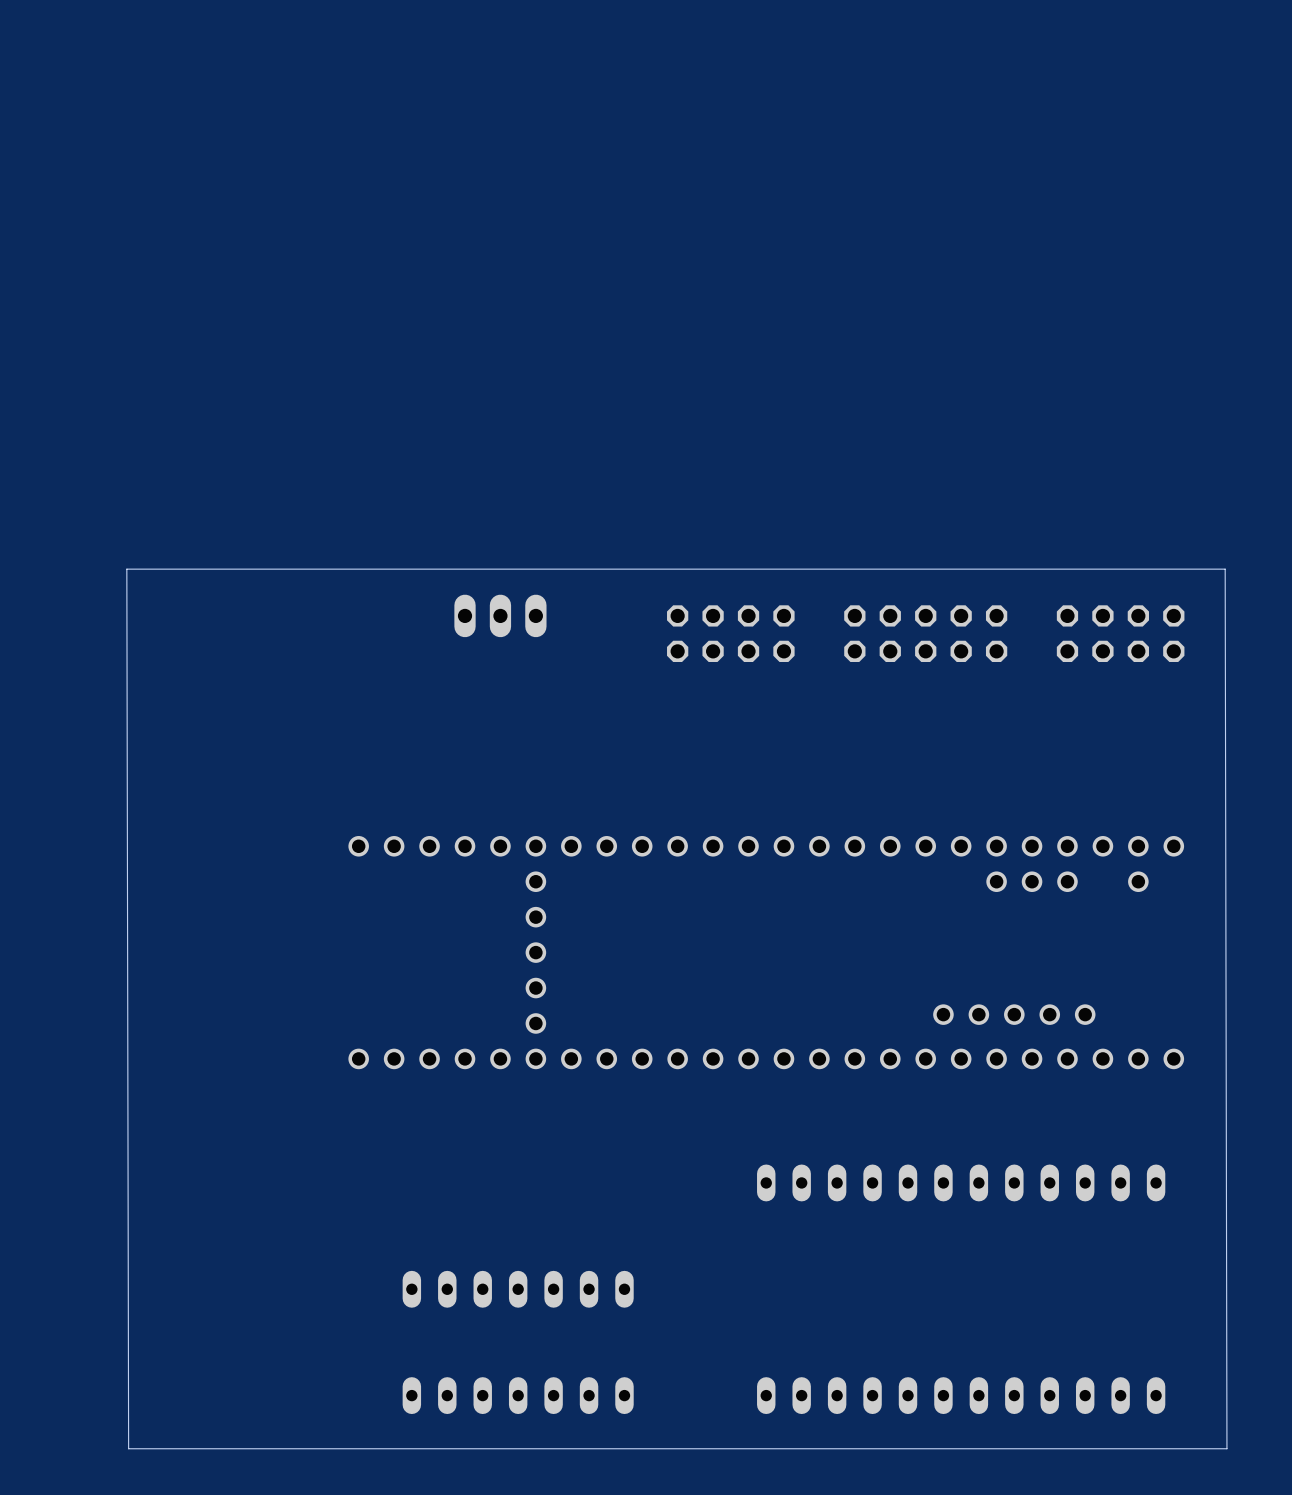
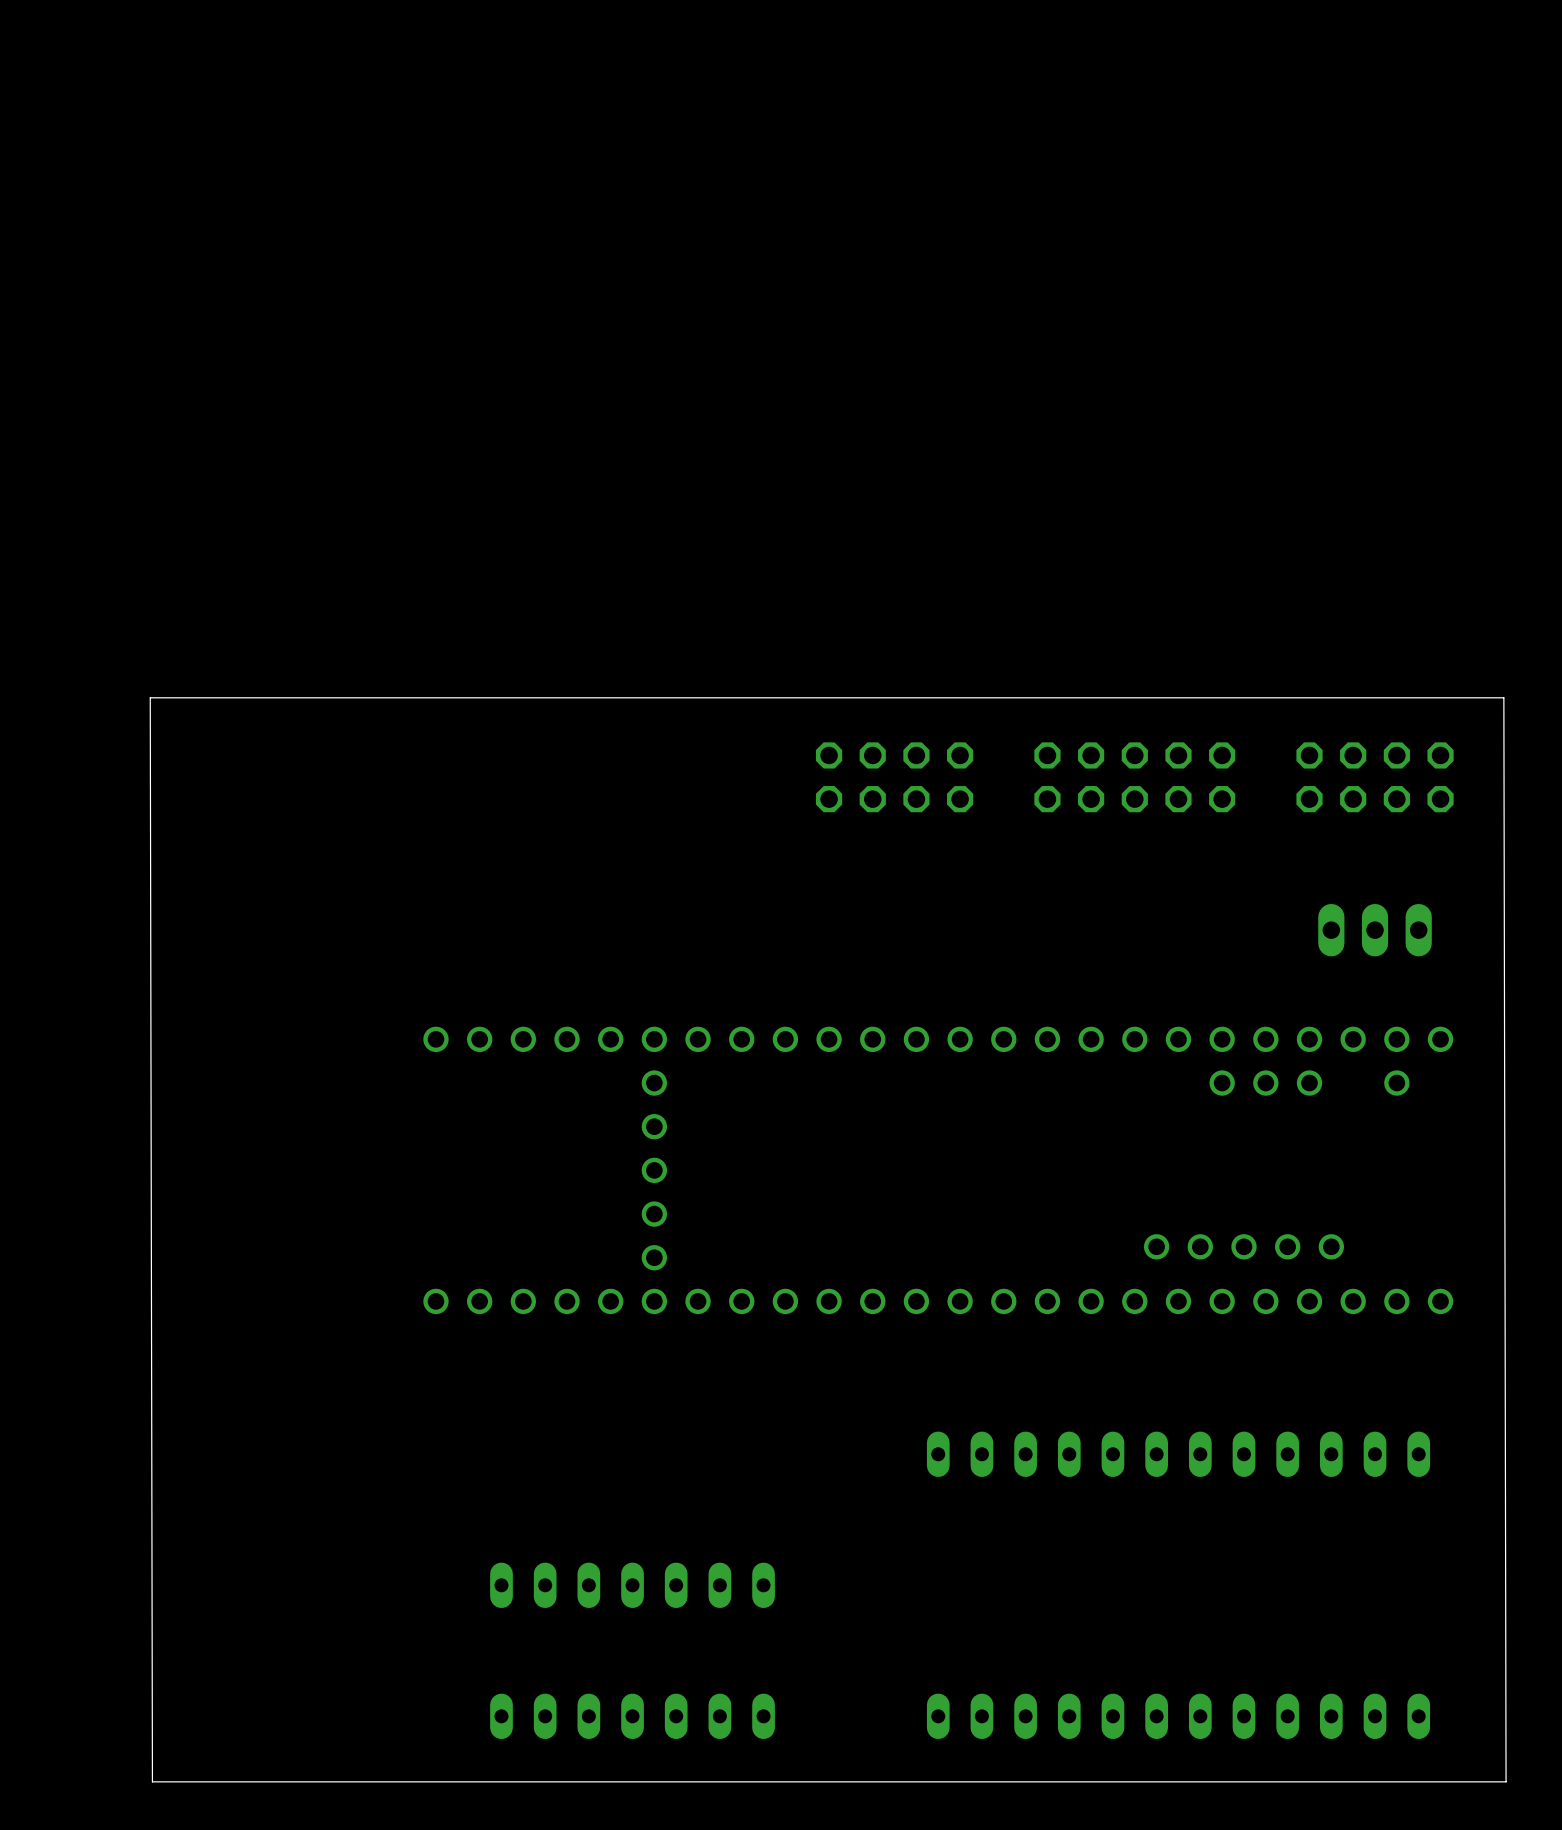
part: (500, 615) -> none
part: none -> (1375, 930)

